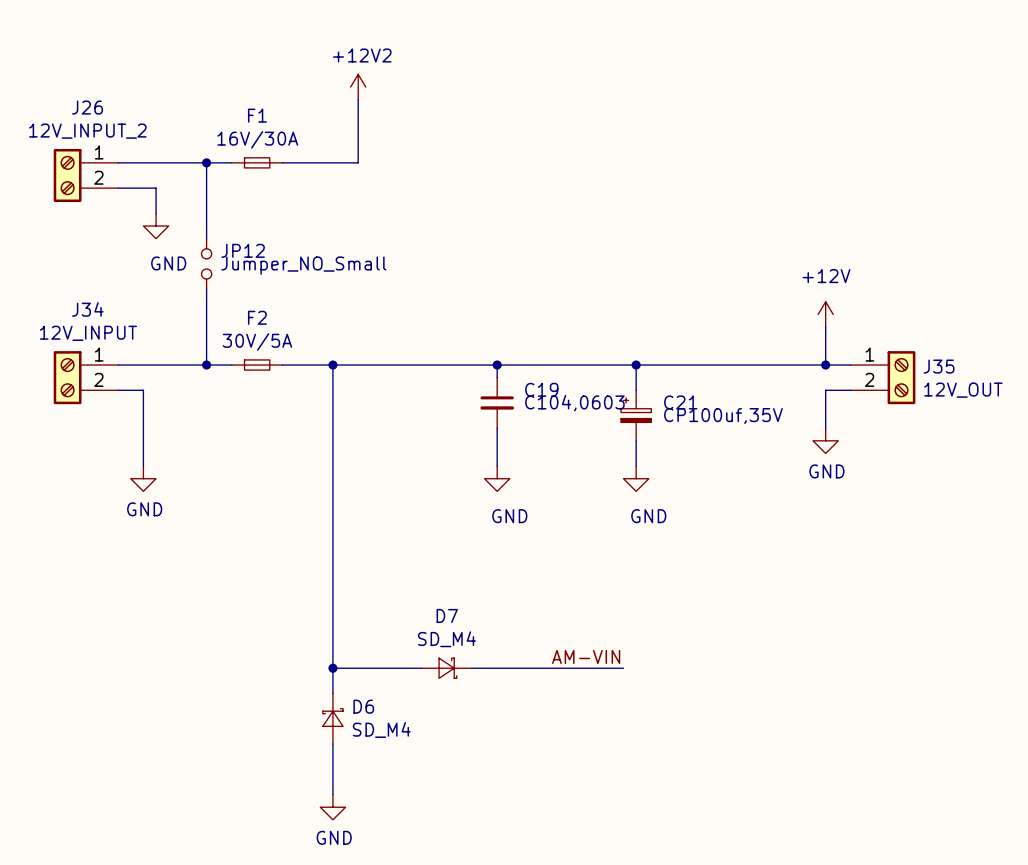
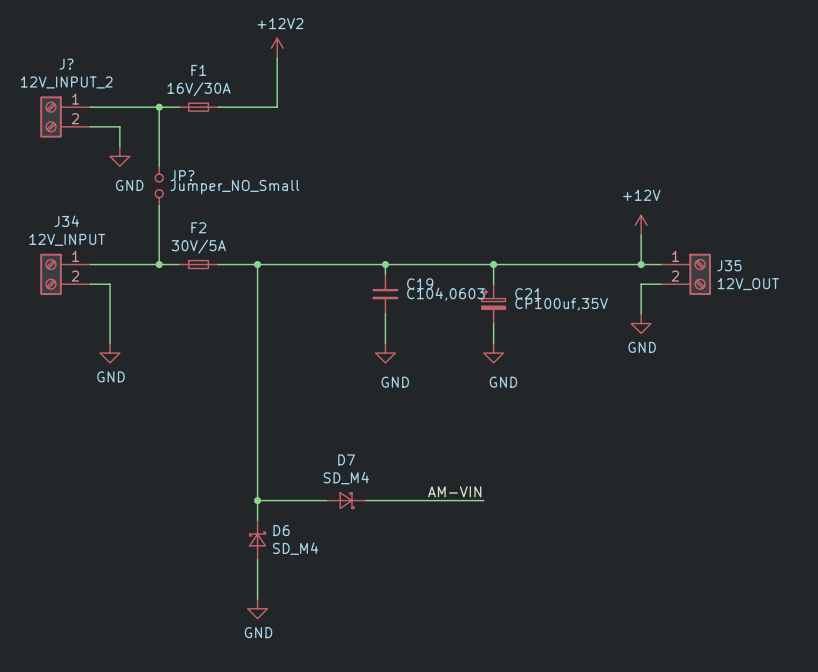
J26 name: J26 (87, 107) -> J? (66, 64)
JP12 name: JP12 (243, 250) -> JP? (182, 175)

